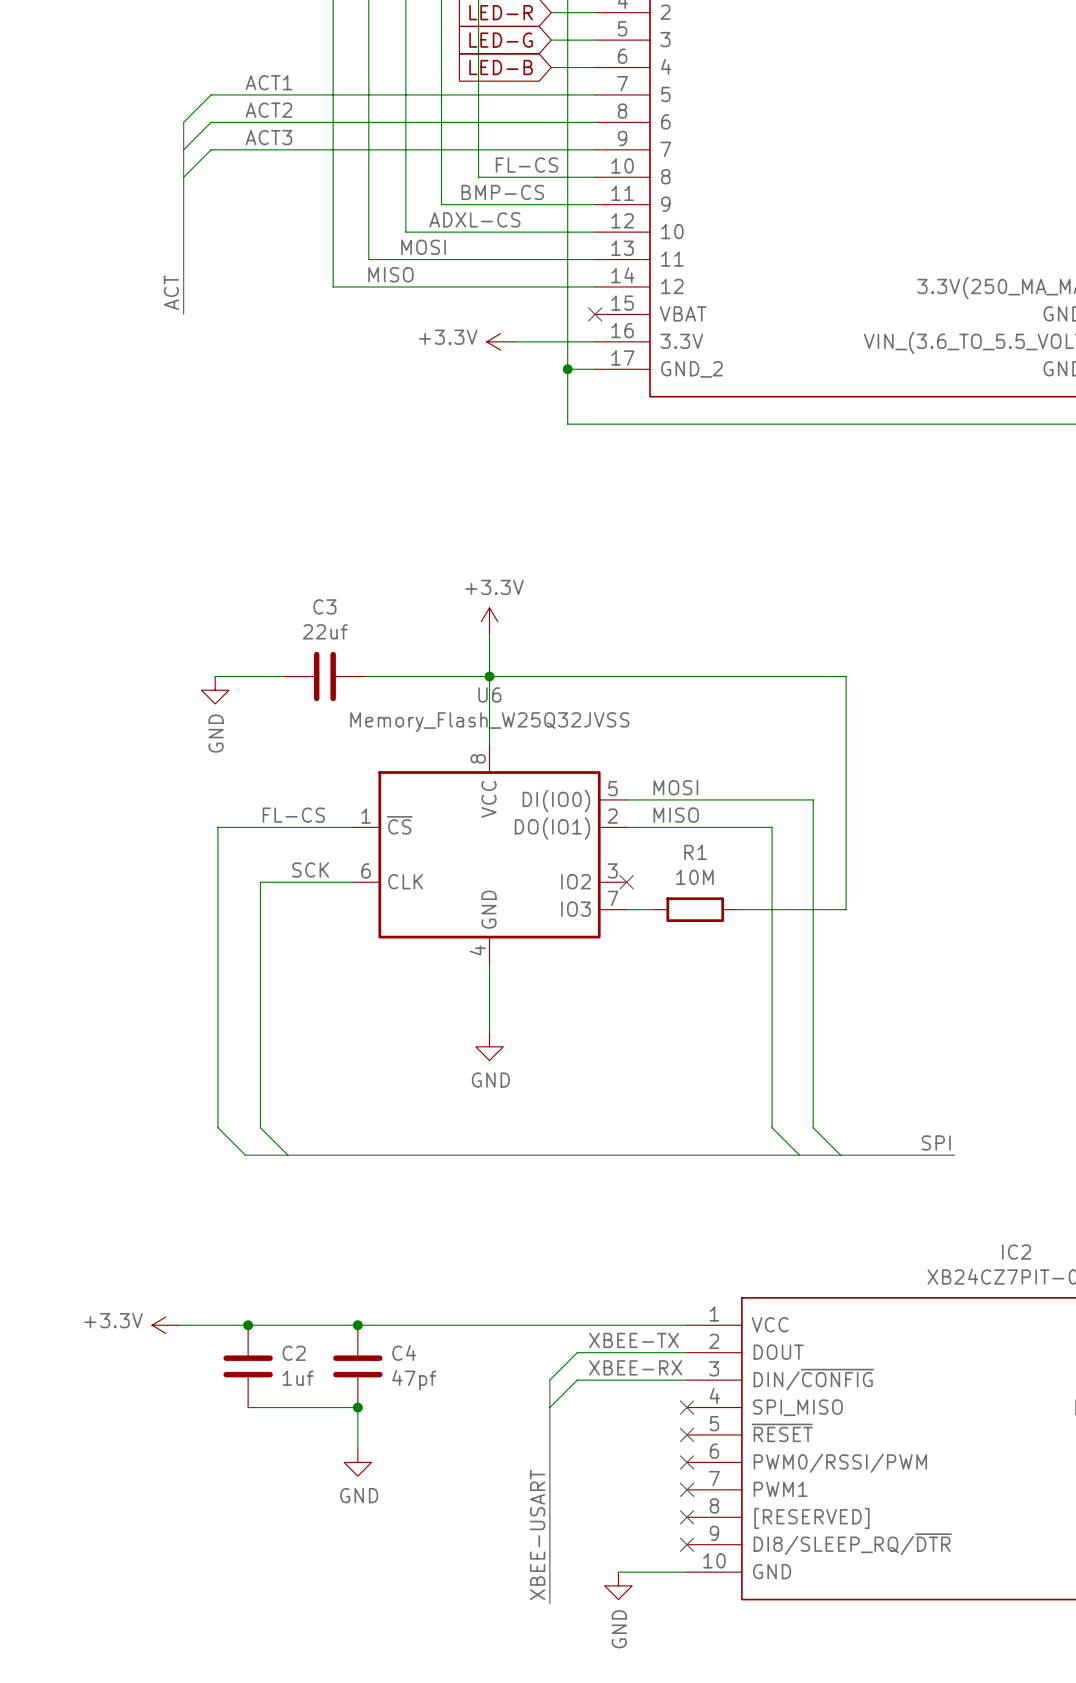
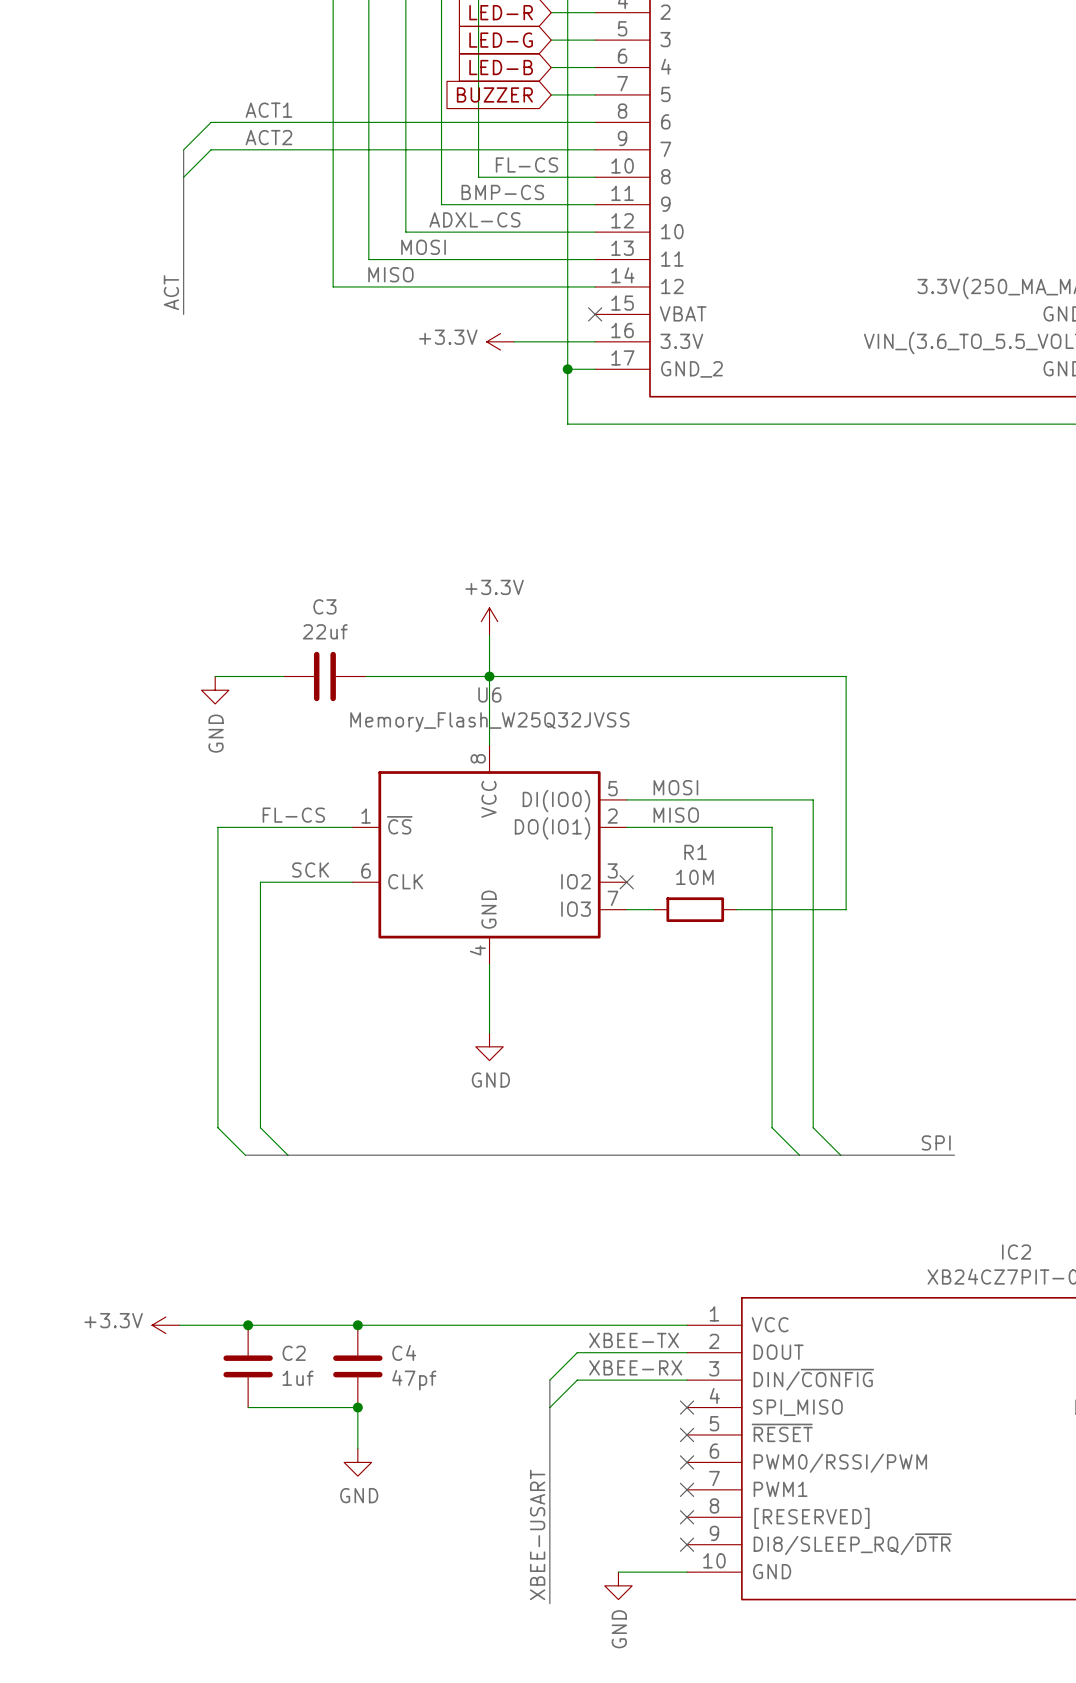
label: ACT1 (268, 82) -> none
global label: none -> BUZZER (494, 94)
wire: (551, 94) (211, 94) (183, 122) -> none
label: ACT2 (268, 110) -> ACT1 (268, 110)
bus: (183, 122) (183, 149) -> none
label: ACT3 (268, 137) -> ACT2 (268, 137)

